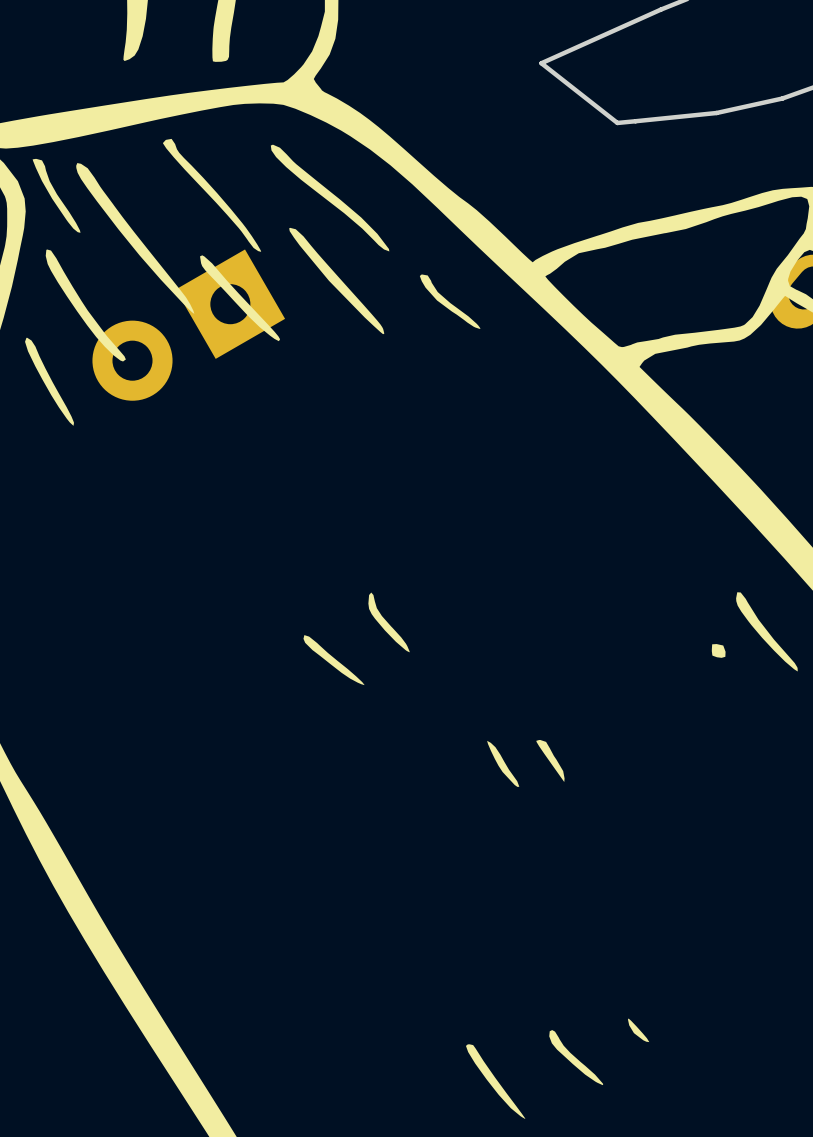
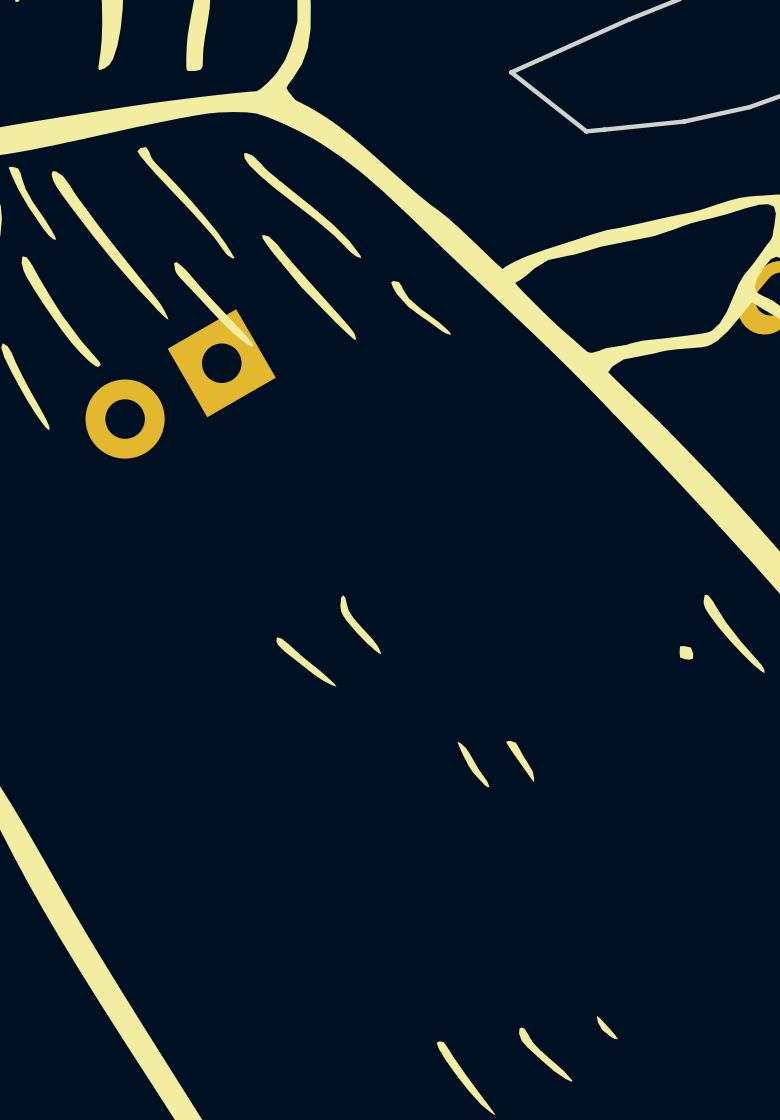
part position: (188, 325) -> (180, 383)

